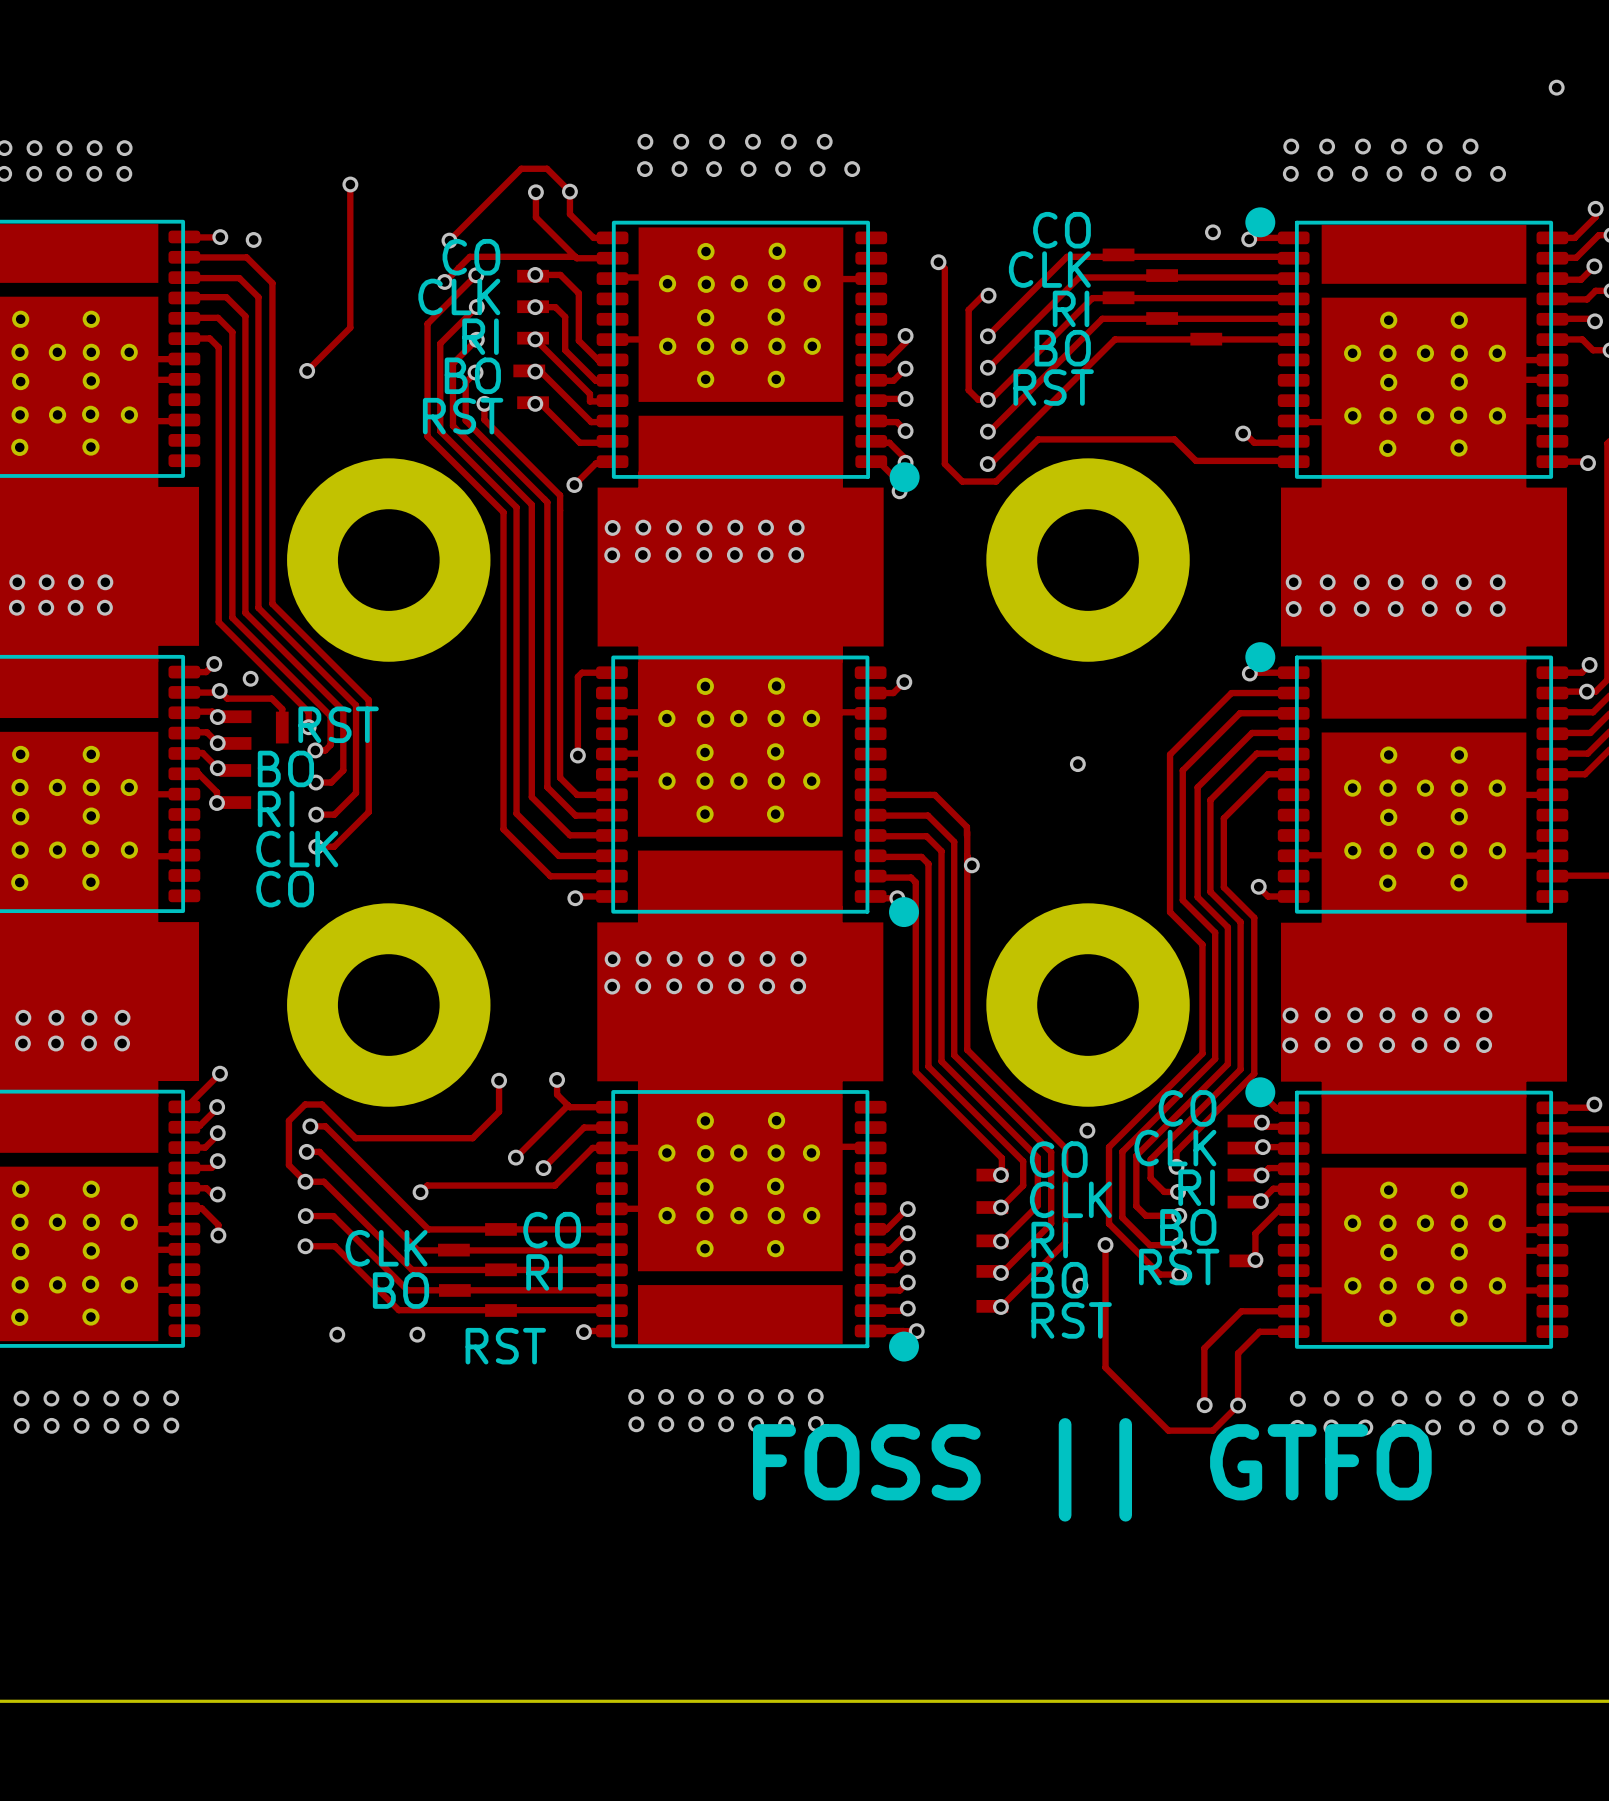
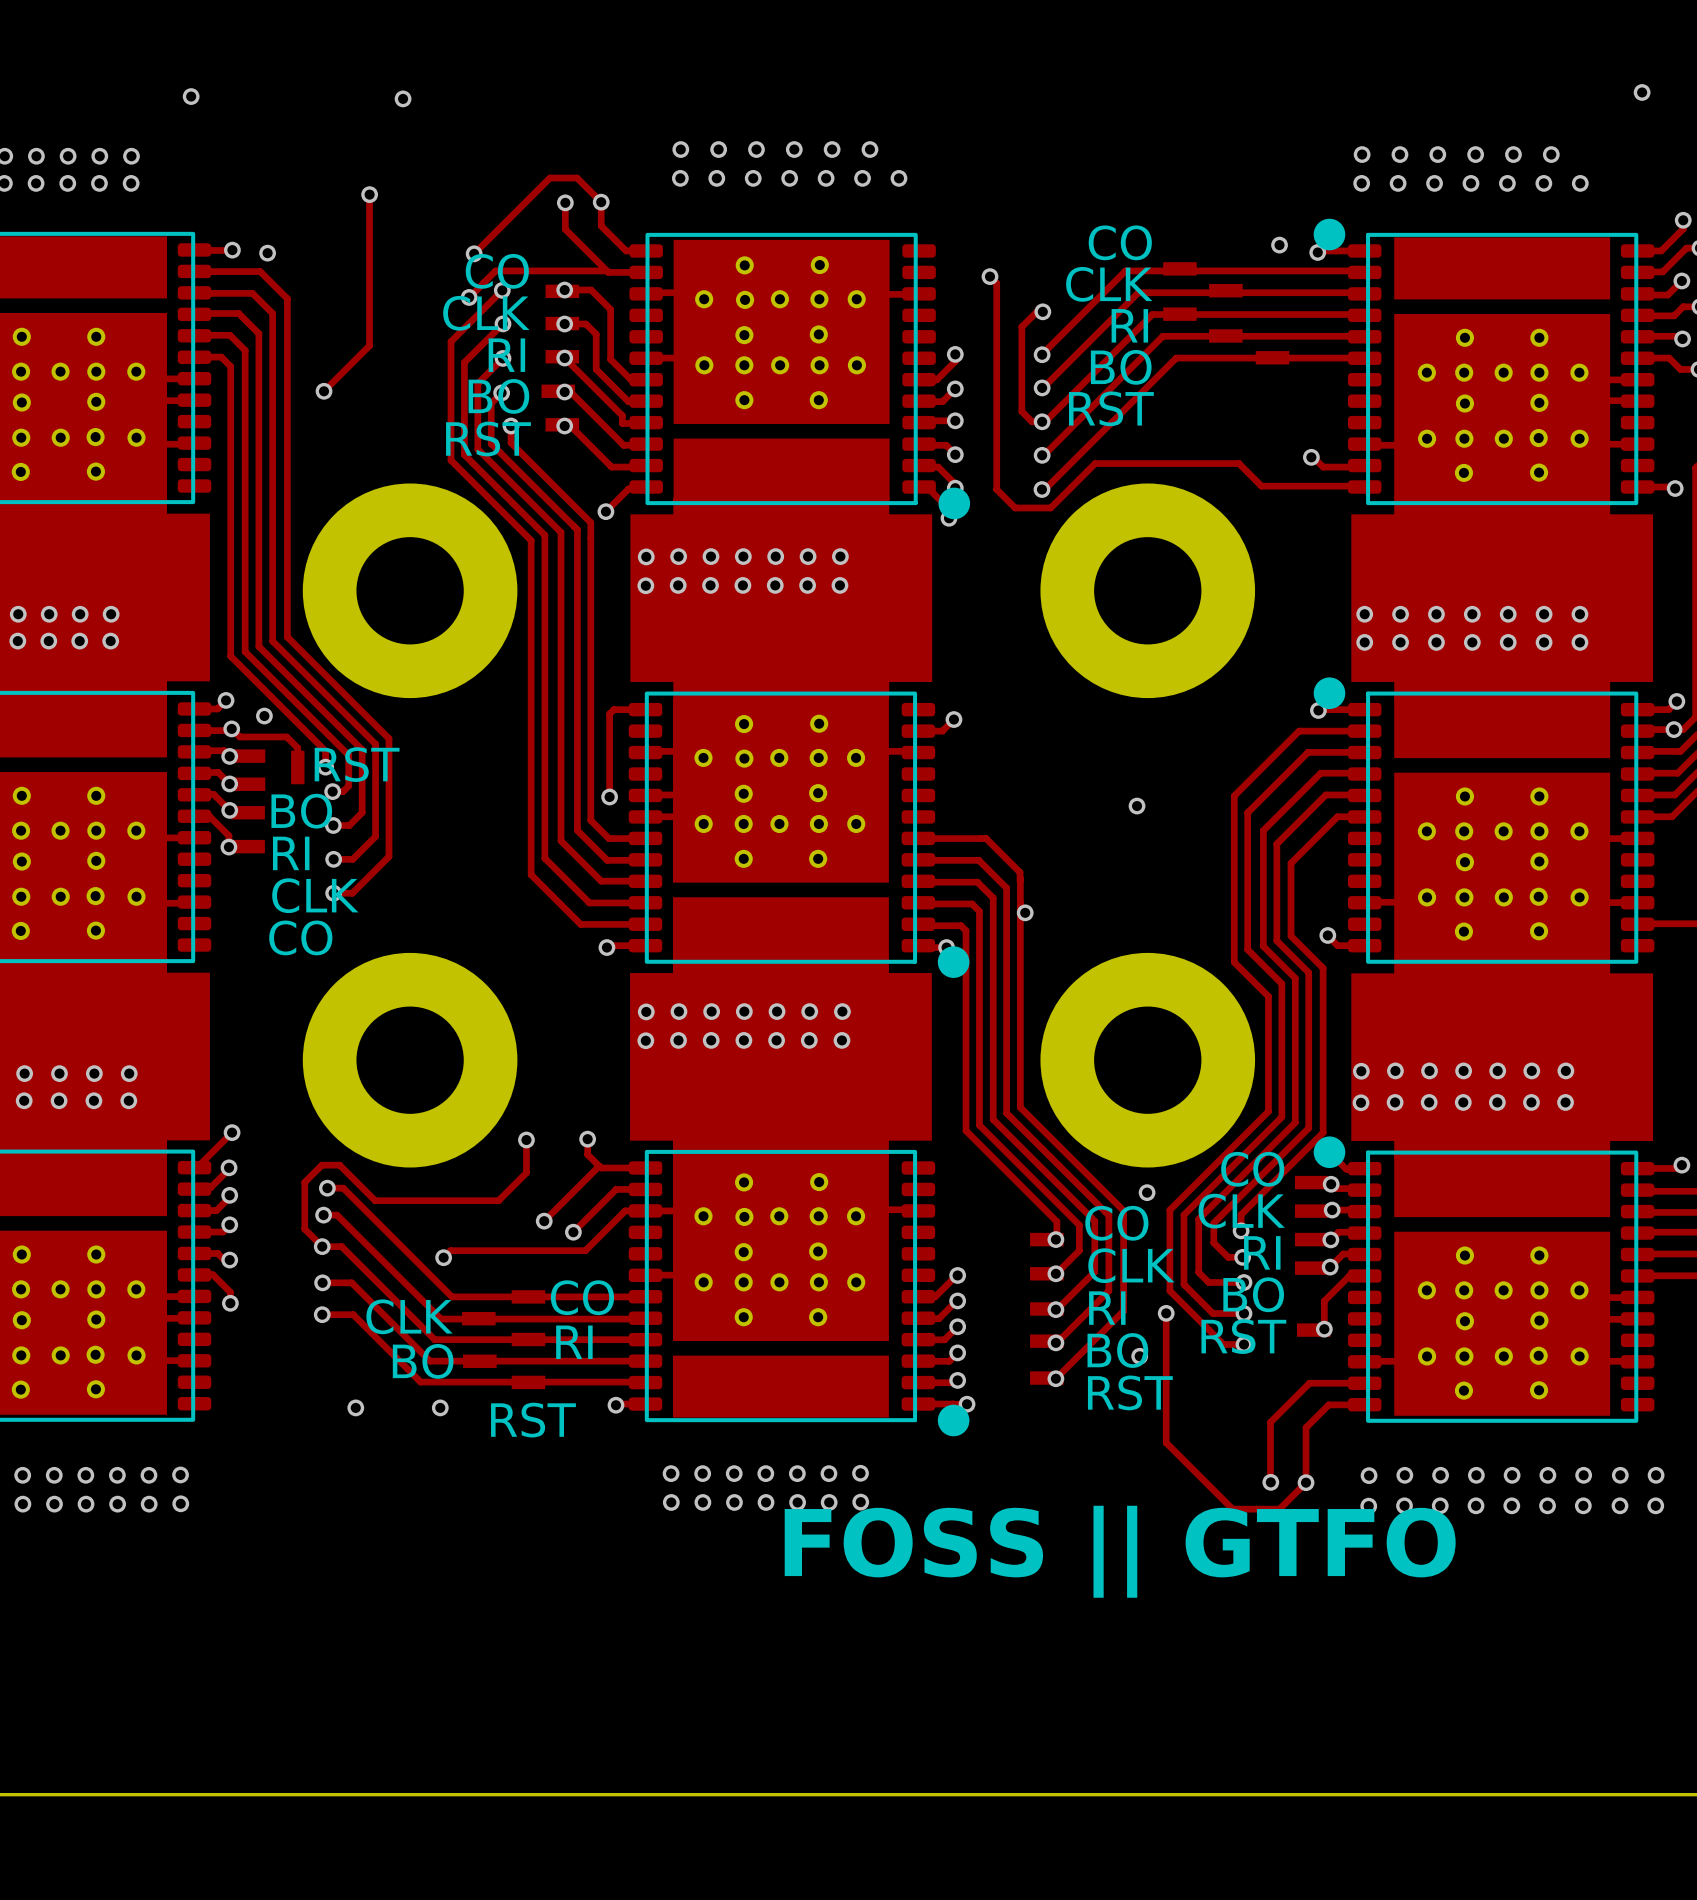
via: none -> (191, 96)
via: none -> (403, 98)

